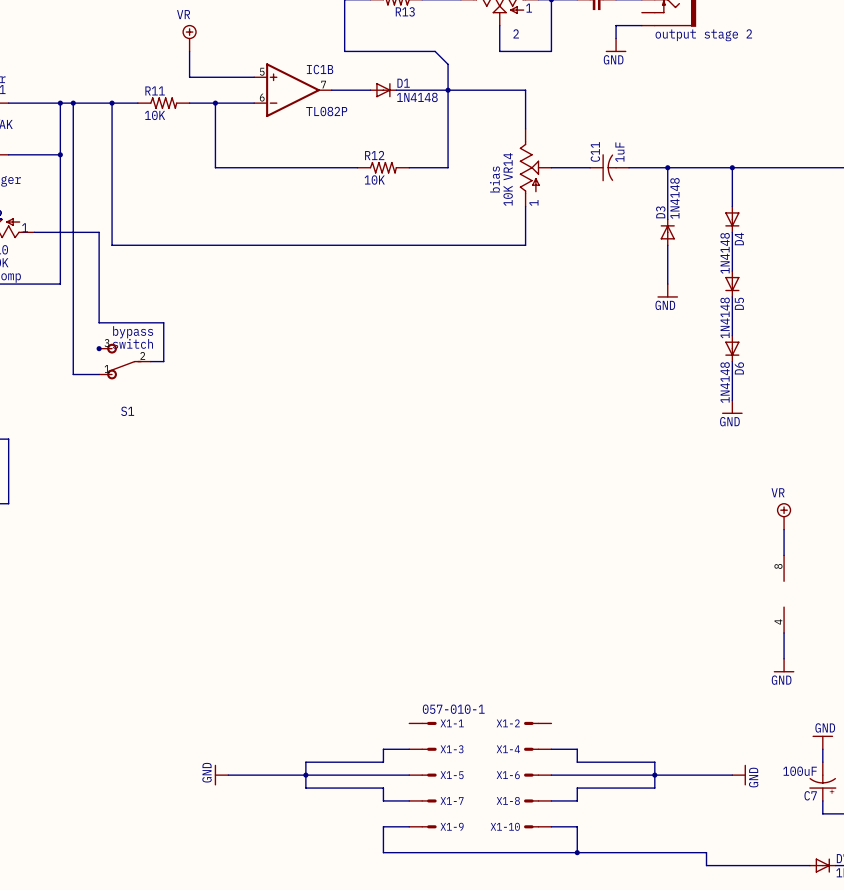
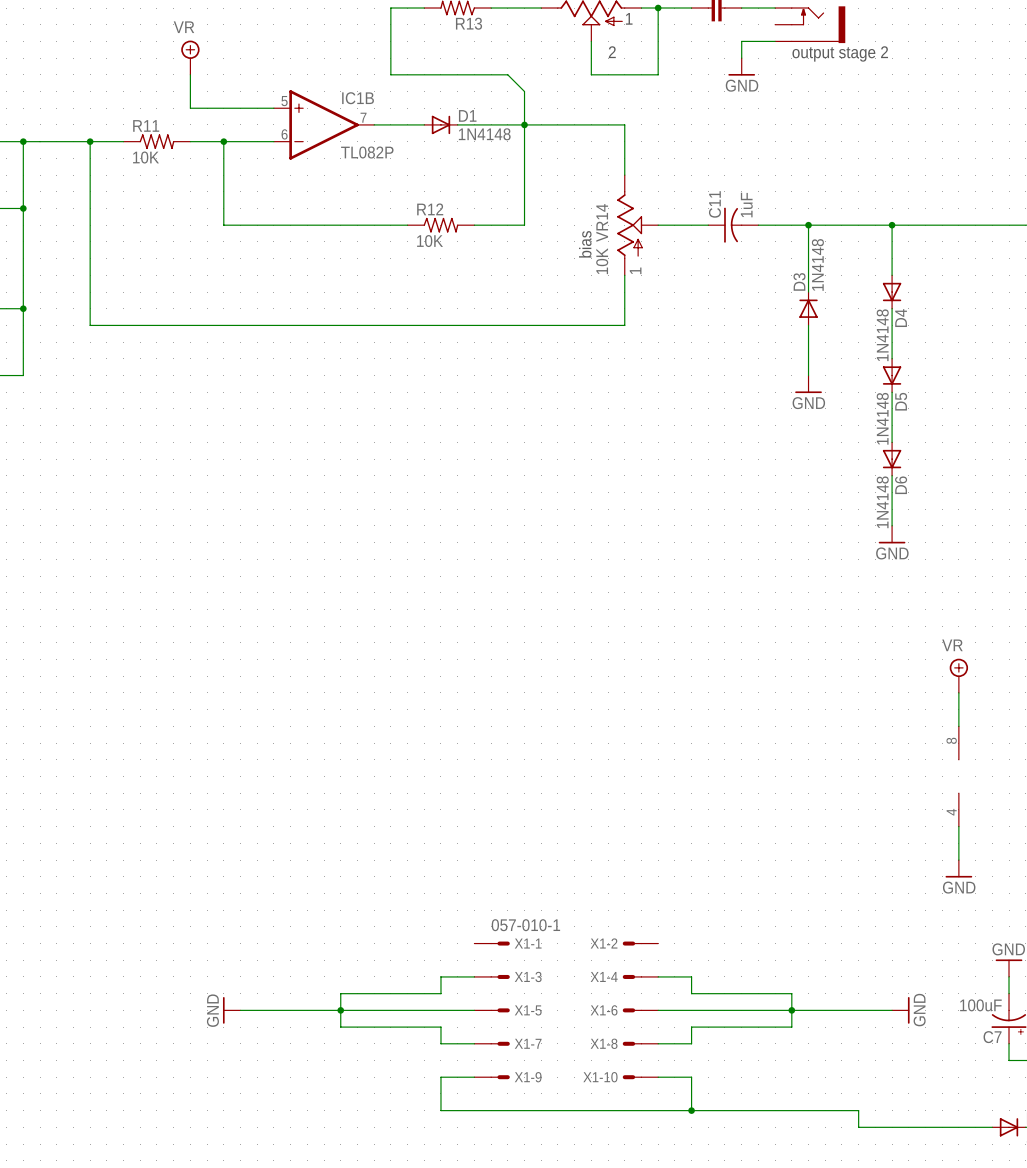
wire: (73, 103) (73, 374) (99, 374) -> none
junction: (73, 103) -> none
wire: (60, 232) (99, 232) (99, 322) (163, 322) (163, 361) (150, 361) -> none
junction: none -> (23, 308)
text: bypass (133, 332) -> none
text: switch (132, 343) -> none
junction: (99, 348) -> none
S1: (124, 361) -> none

